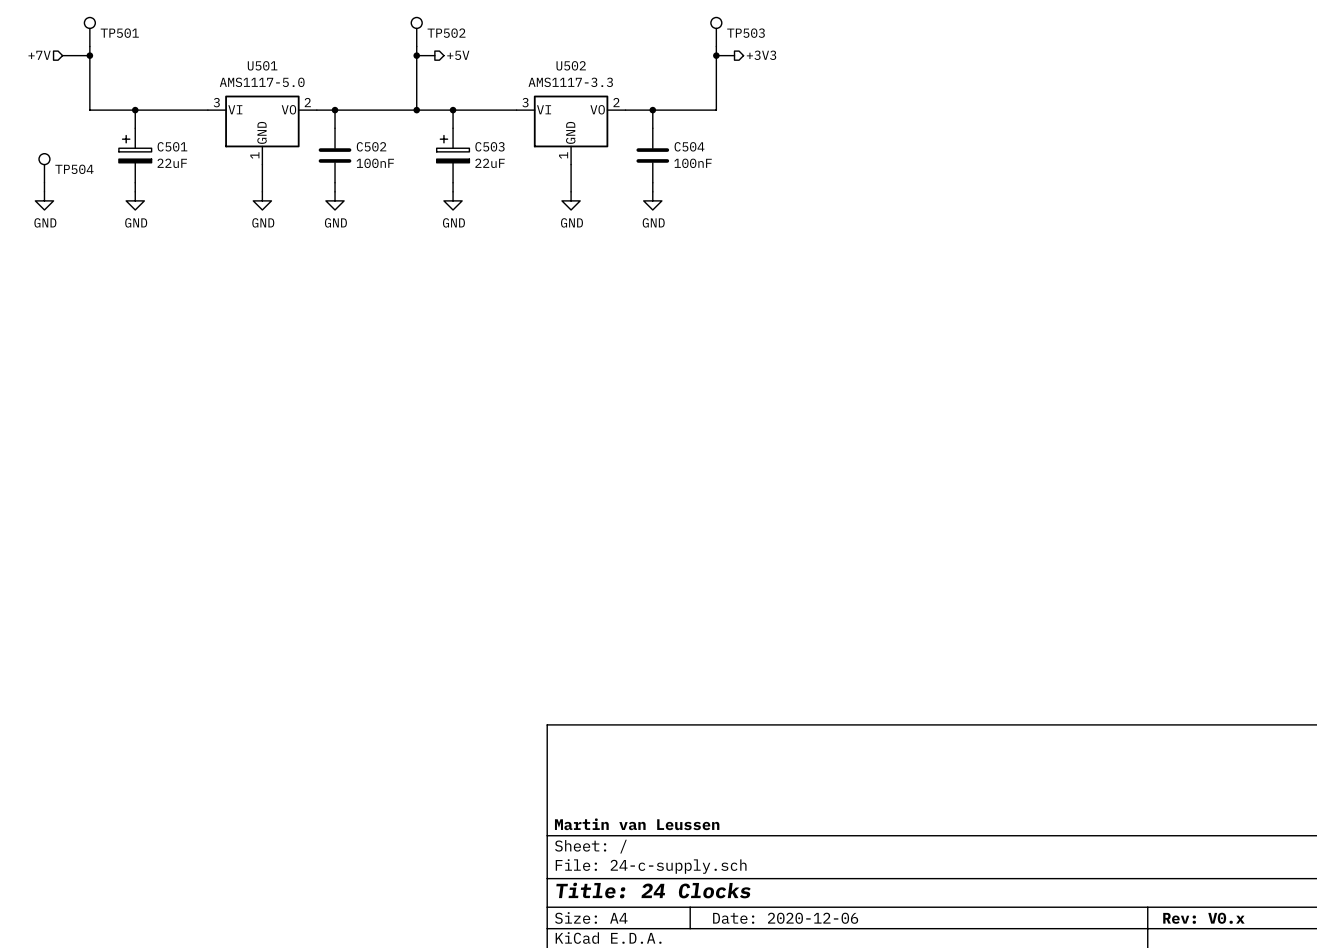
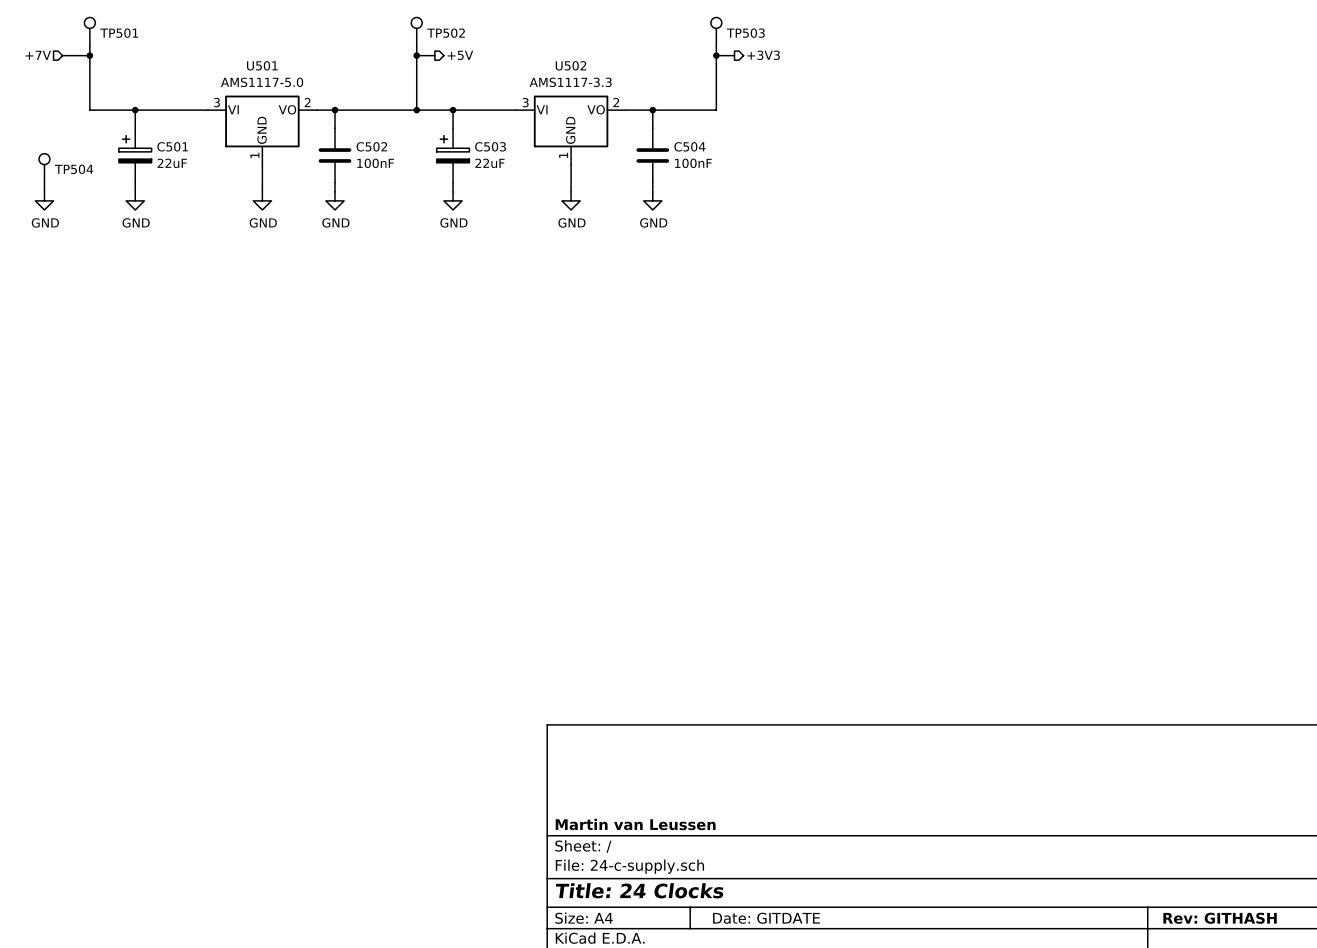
title block: Date: 2020-12-06 (785, 918) -> Date: GITDATE (766, 918)
title block: Rev: V0.x (1203, 918) -> Rev: GITHASH (1220, 918)

